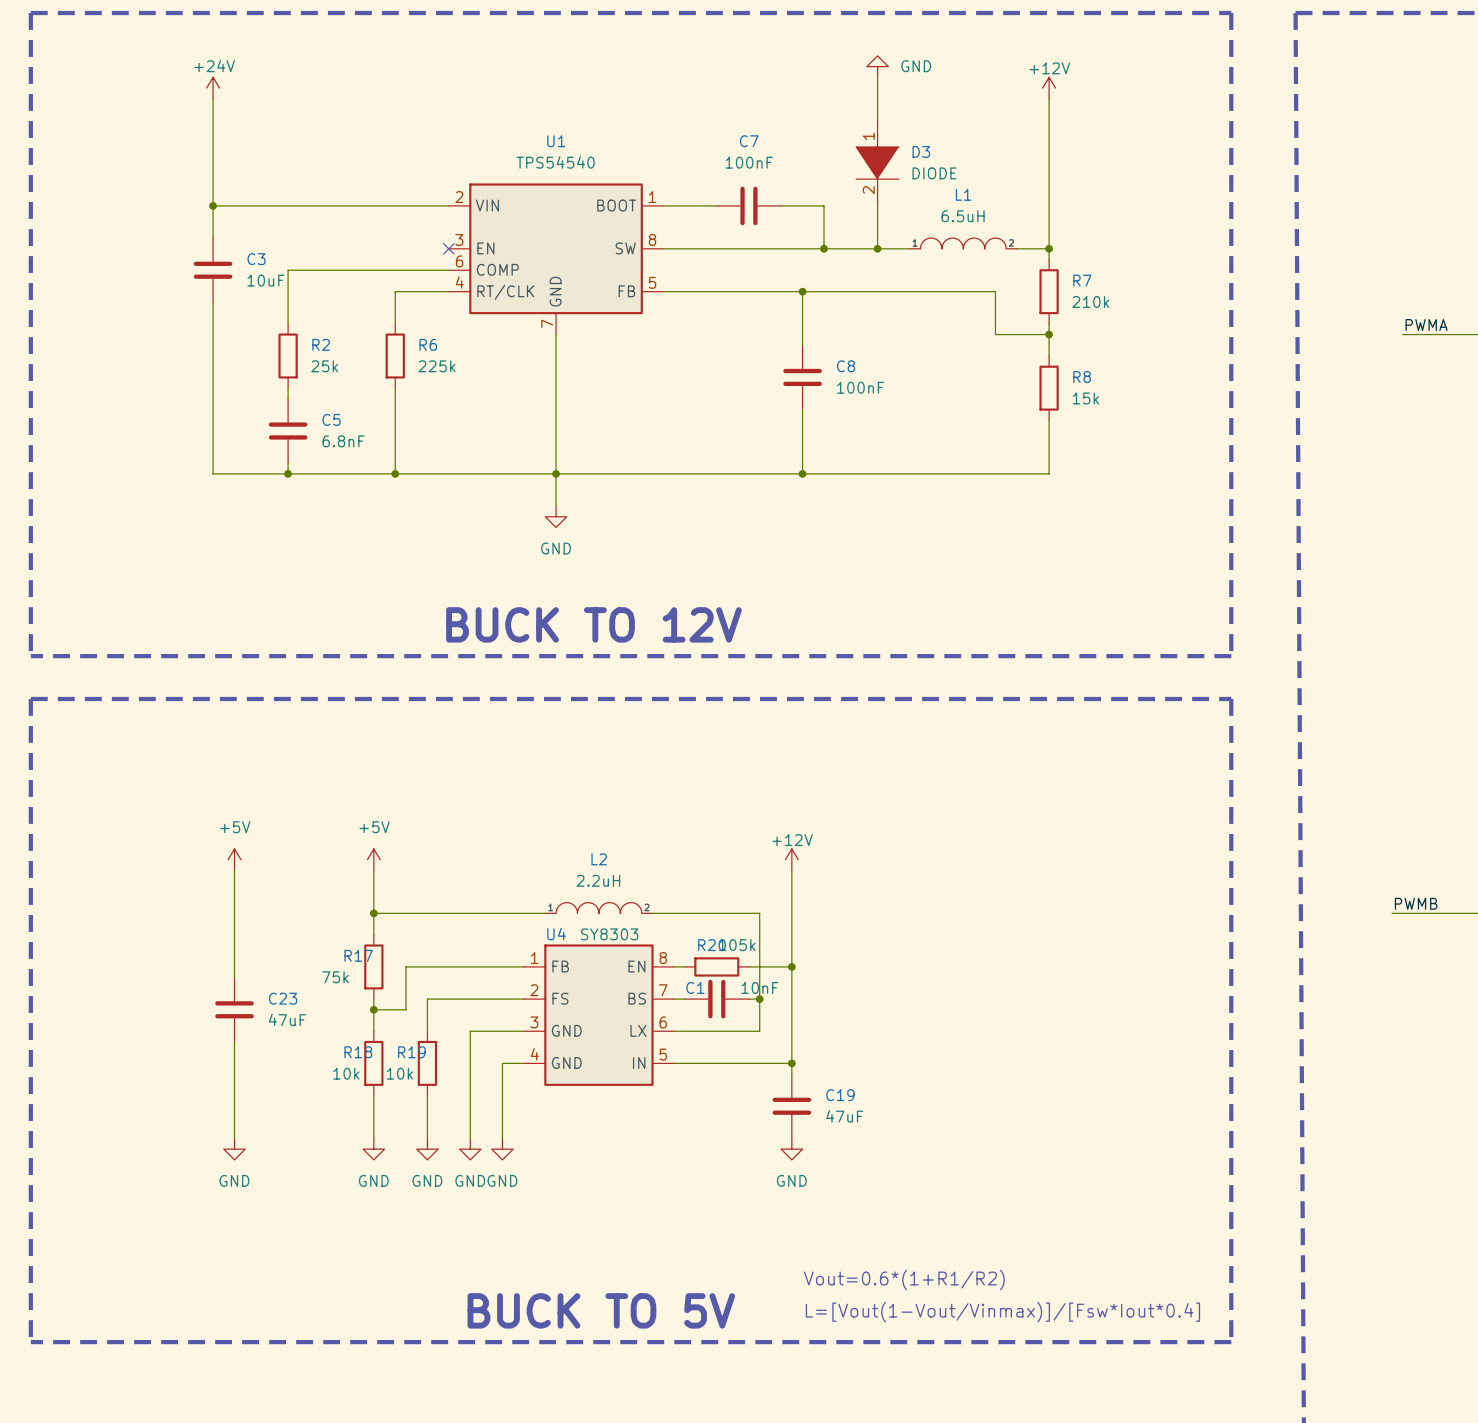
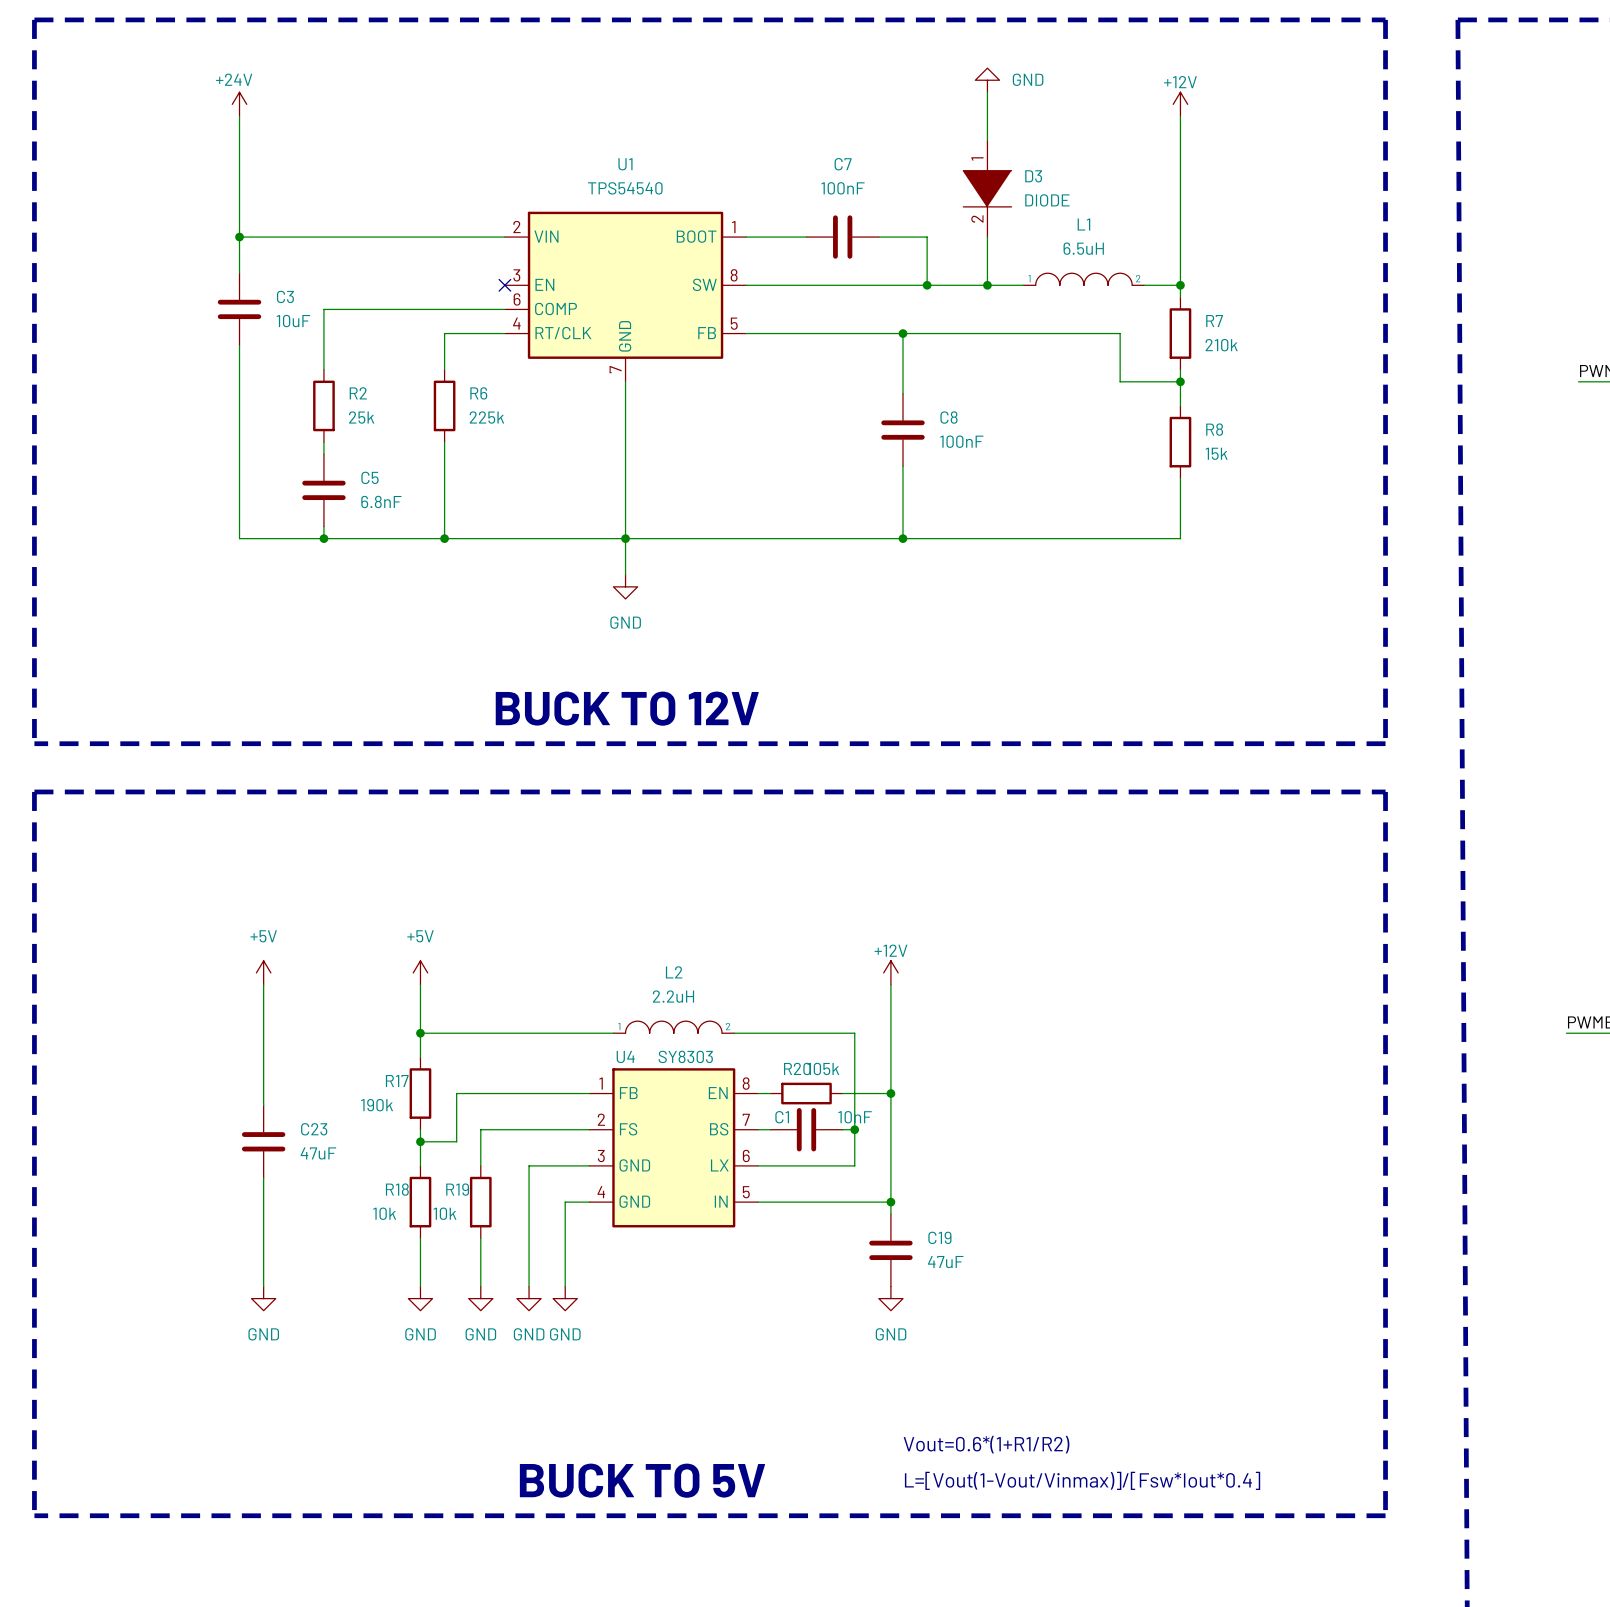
R17 value: 75k (335, 977) -> 190k (377, 1105)

